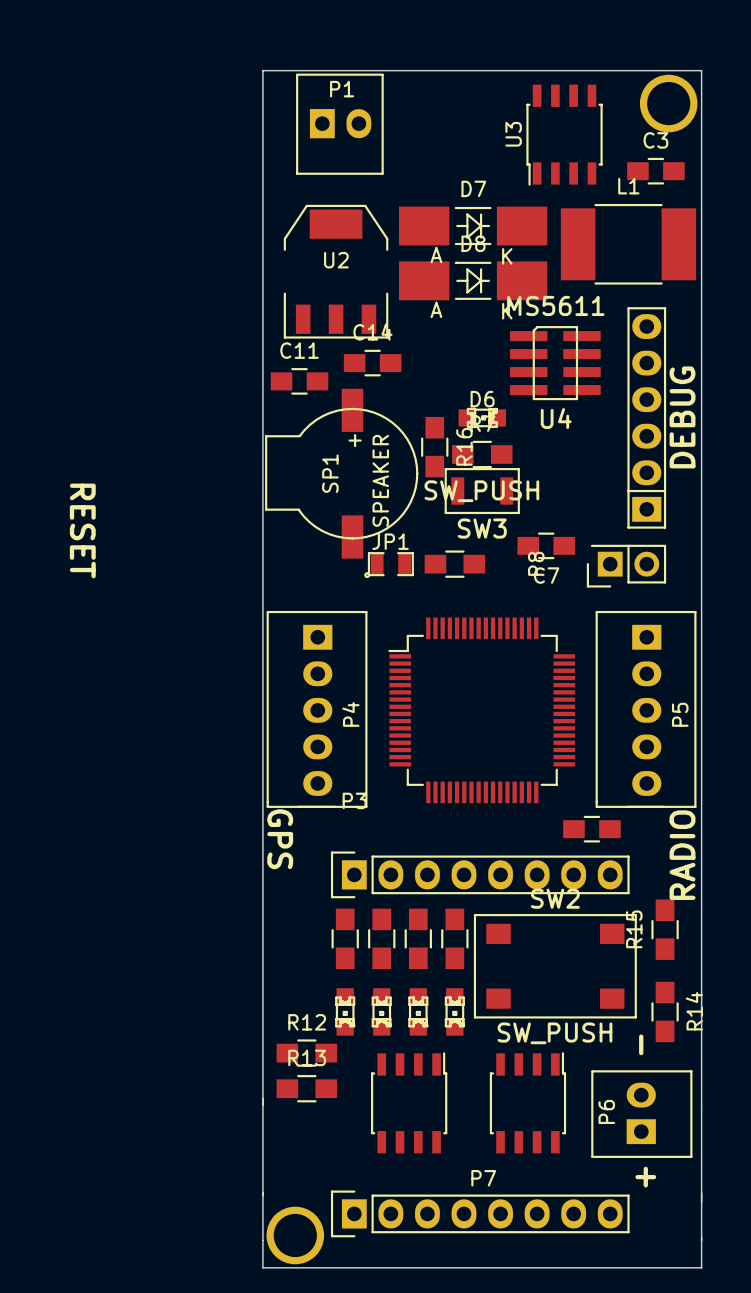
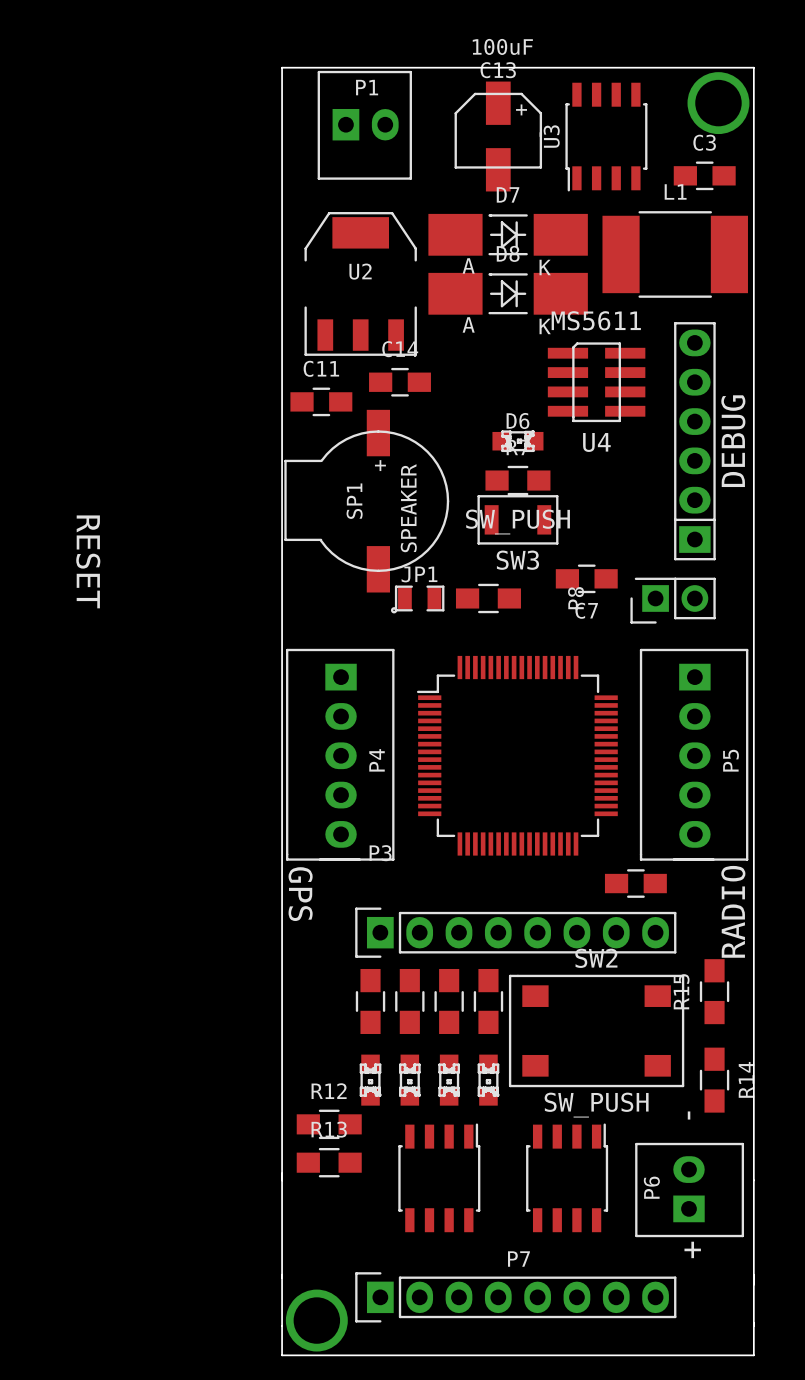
C13: none -> 100uF (498, 136)
R16: (434, 447) -> none

